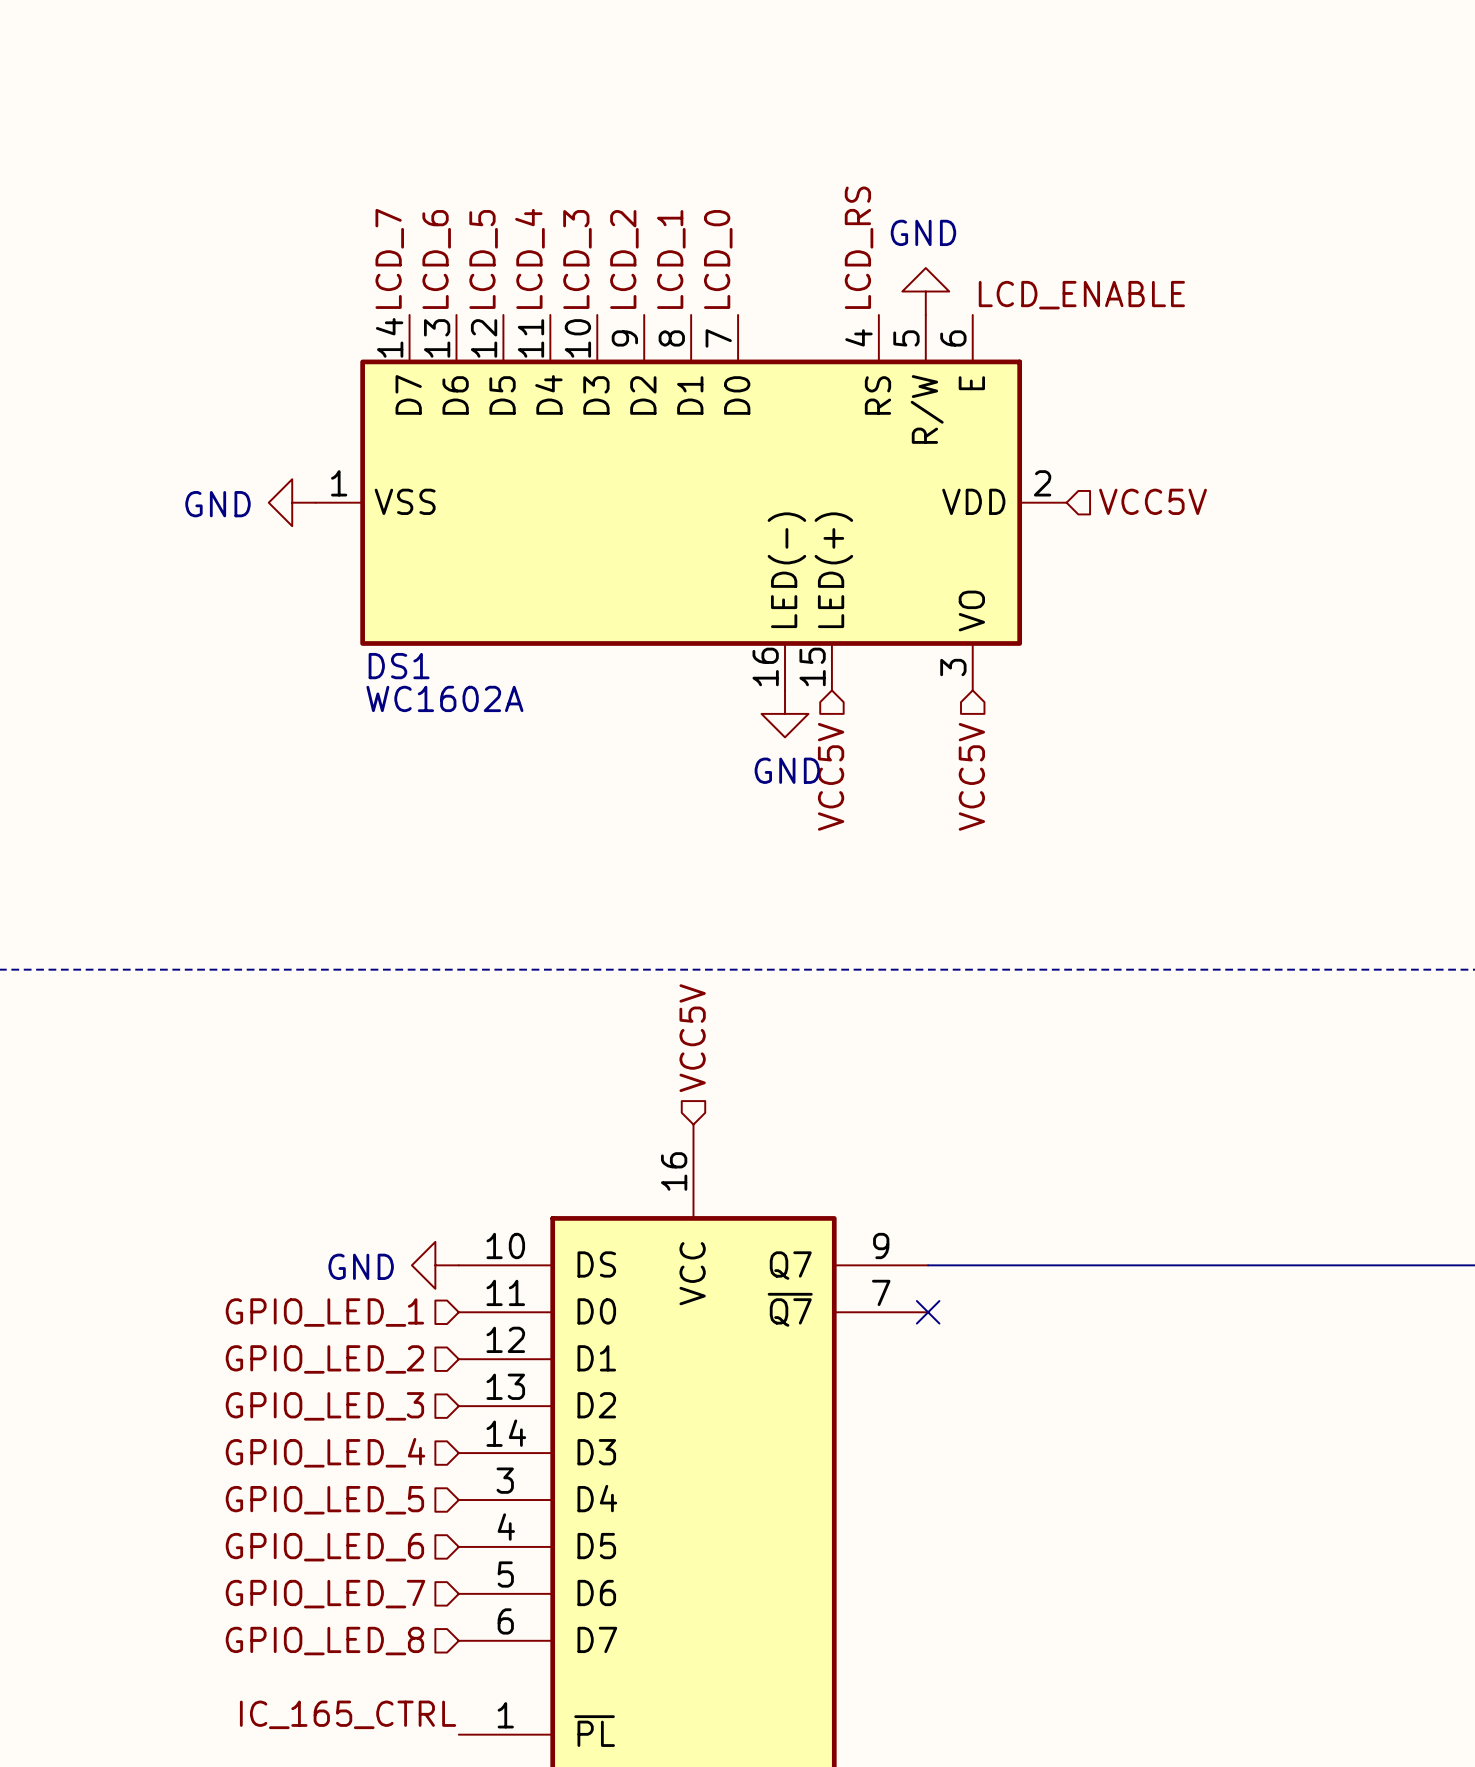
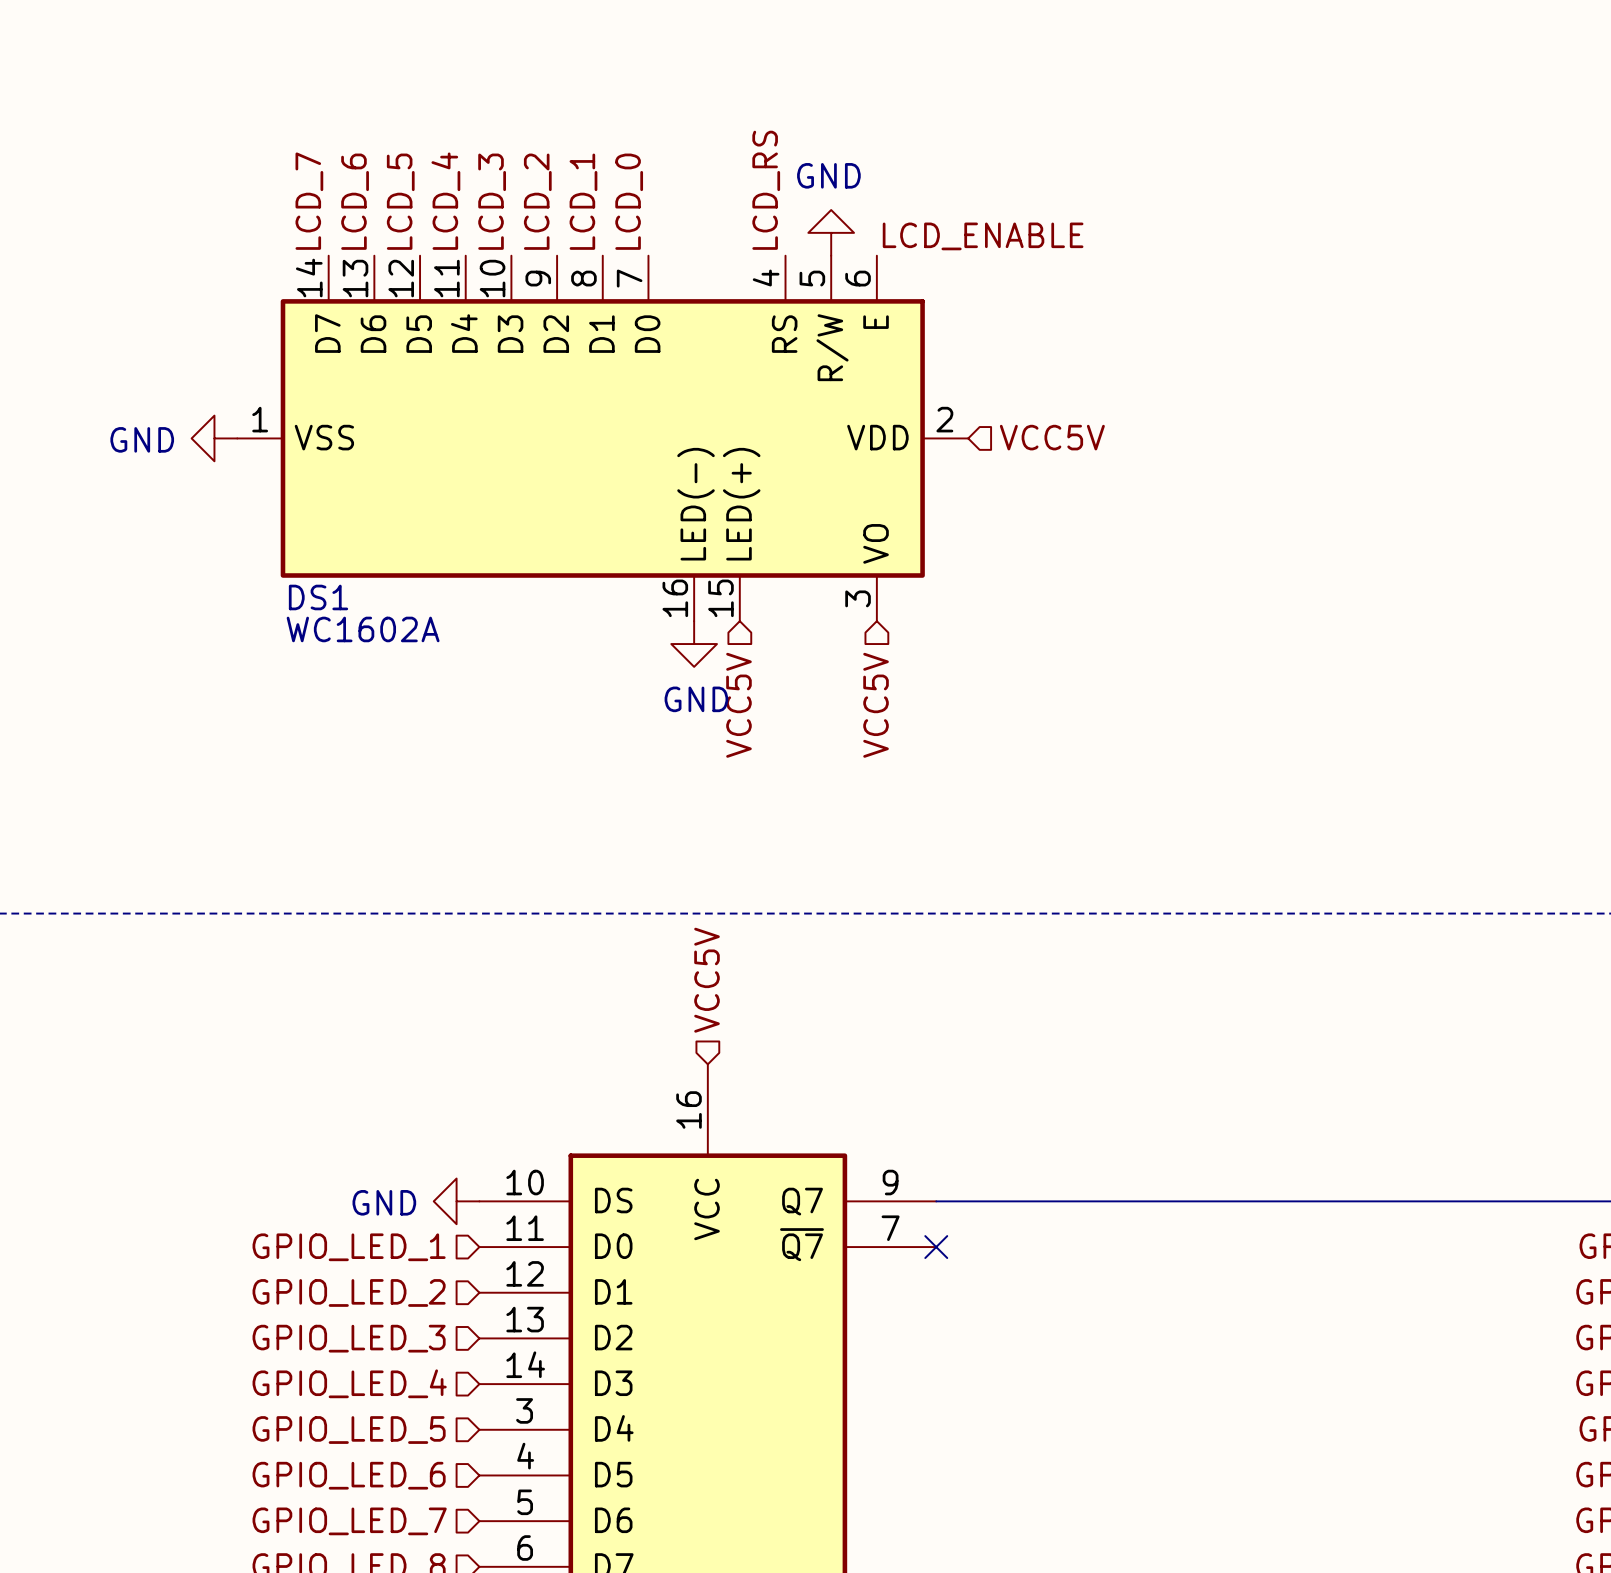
label position: LCD_RS (859, 247) -> LCD_RS (766, 190)
label position: LCD_7 (389, 258) -> LCD_7 (309, 201)
label position: LCD_4 (529, 258) -> LCD_4 (445, 201)
label position: LCD_6 (436, 259) -> LCD_6 (355, 201)
label position: LCD_5 (483, 259) -> LCD_5 (400, 201)
label position: LCD_3 (577, 259) -> LCD_3 (492, 201)
label position: LCD_2 (624, 259) -> LCD_2 (537, 201)
label position: LCD_1 (671, 259) -> LCD_1 (583, 201)
label position: LCD_0 (718, 259) -> LCD_0 (629, 201)
power symbol position: GND (925, 291) -> GND (831, 232)
label position: LCD_ENABLE (1081, 295) -> LCD_ENABLE (983, 236)
hierarchical label position: VCC5V (1153, 501) -> VCC5V (1052, 437)
power symbol position: GND (292, 502) -> GND (214, 438)
DS1 position: (691, 502) -> (602, 438)
power symbol position: GND (785, 713) -> GND (694, 644)
hierarchical label: none -> VCC5V (738, 705)
hierarchical label position: VCC5V (831, 776) -> VCC5V (876, 705)
hierarchical label: VCC5V (971, 776) -> none

